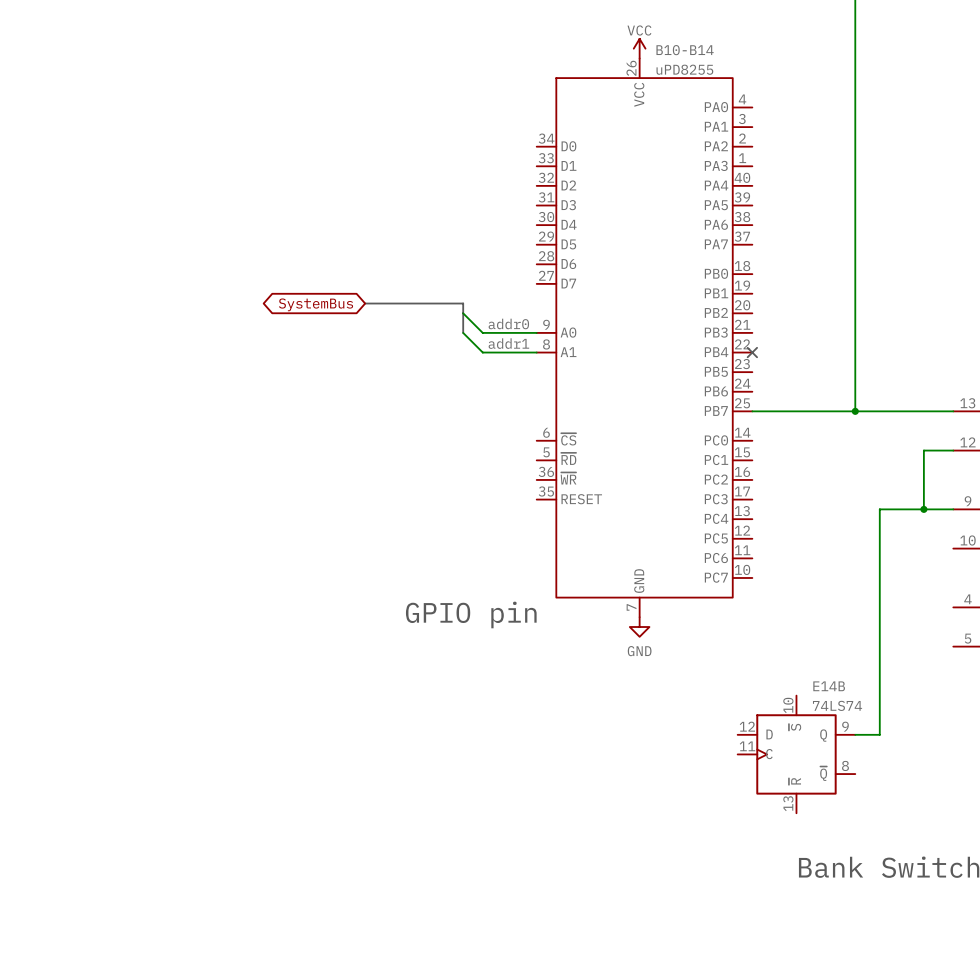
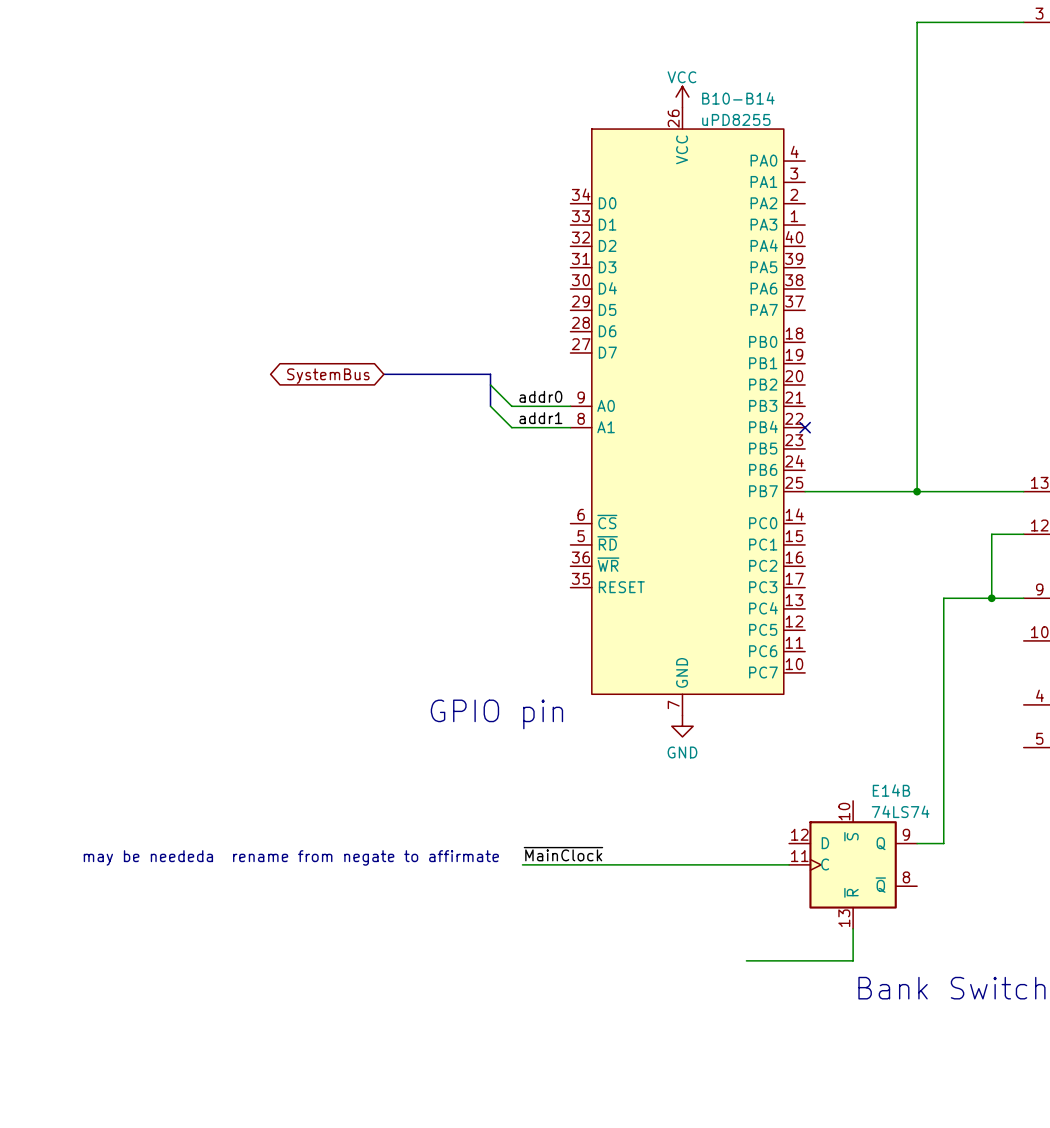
label: none -> ~{MainClock} (563, 854)
text: none -> may be neededa rename from negate to affirmate (291, 857)
wire: none -> (522, 864) (789, 864)
wire: none -> (853, 928) (853, 960) (746, 960)

